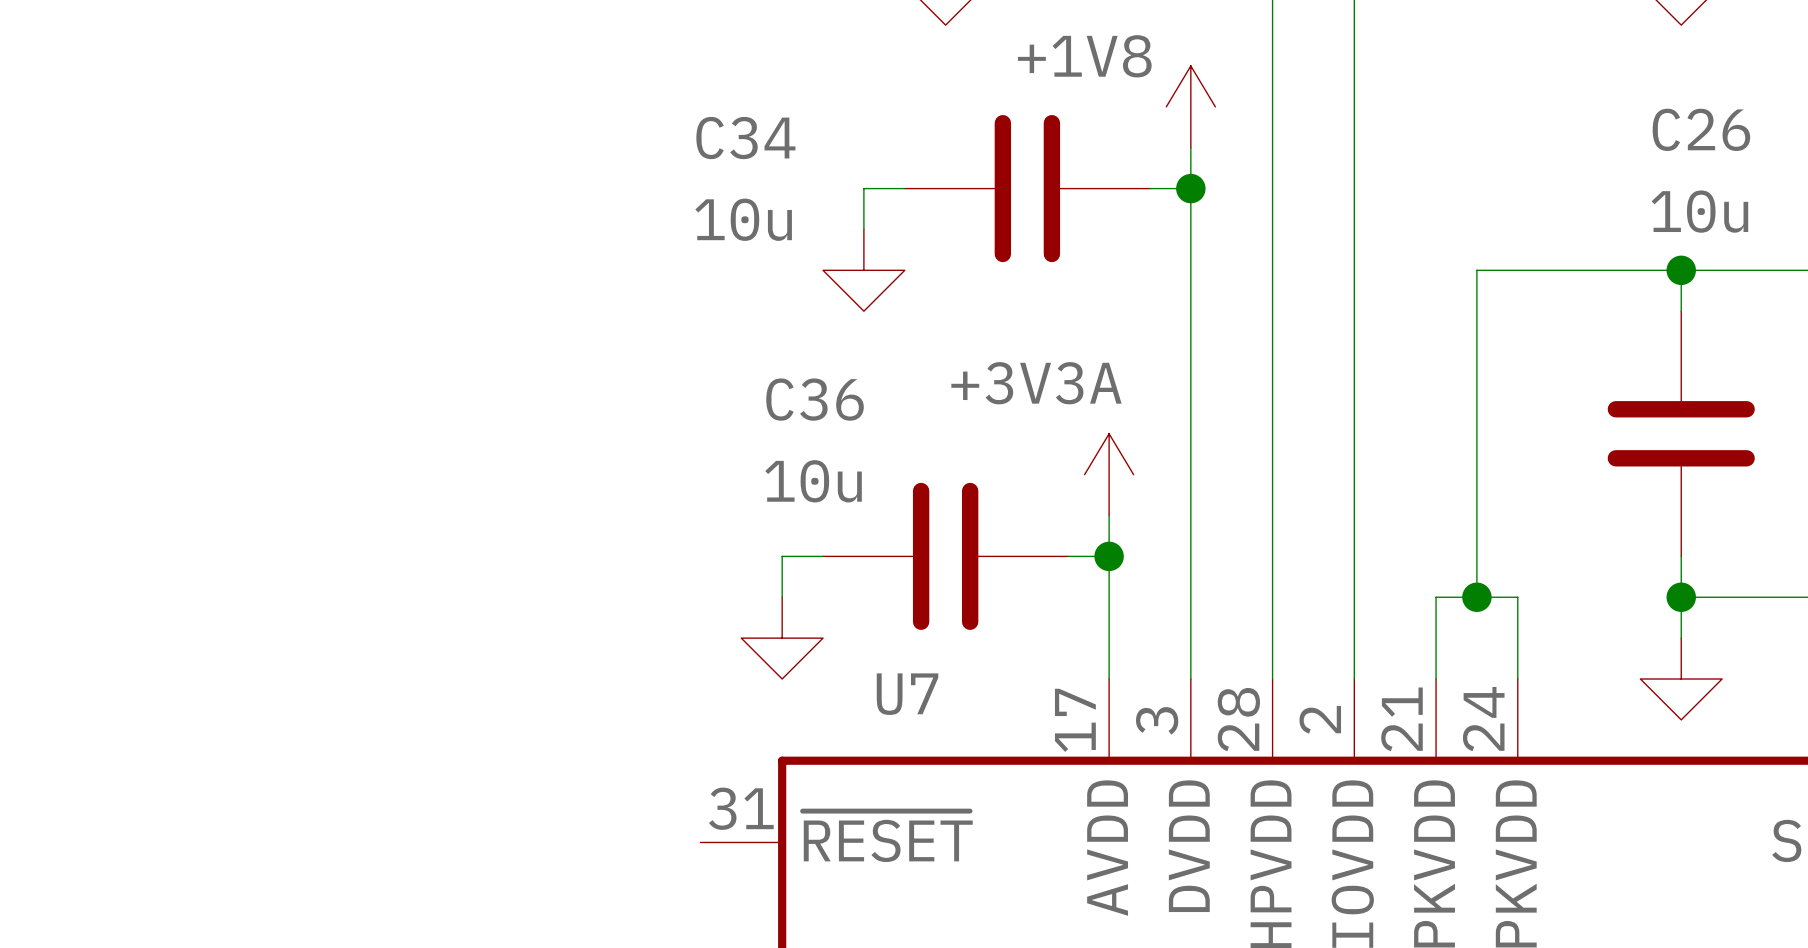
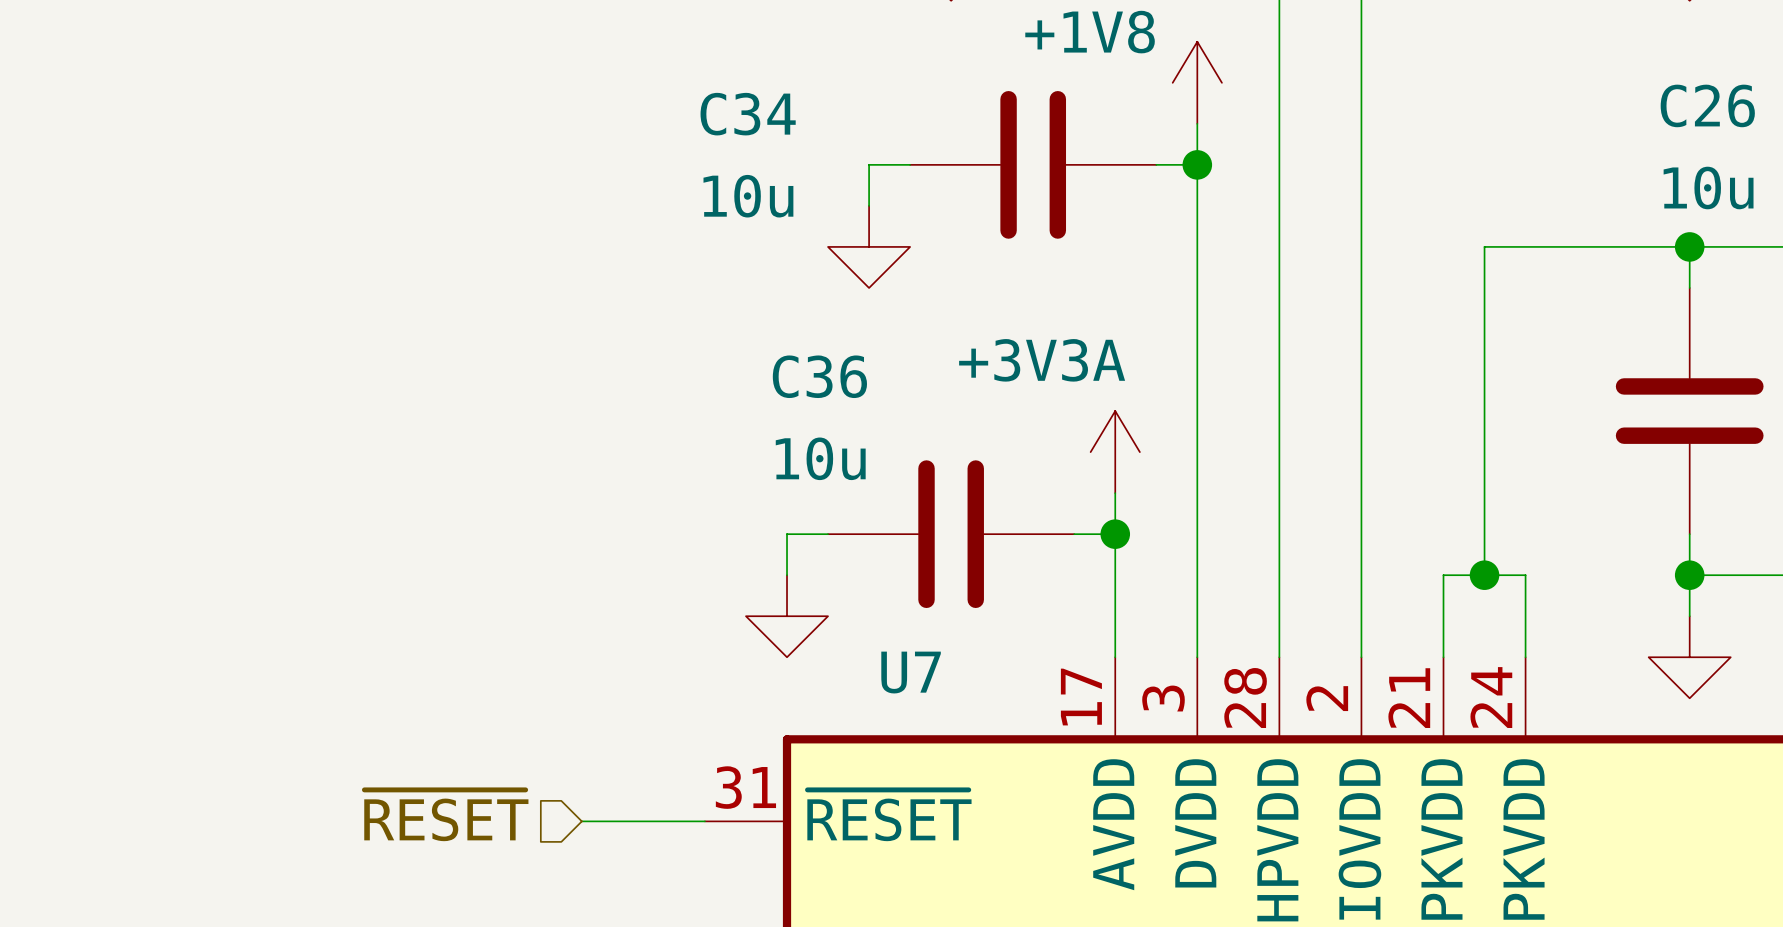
hierarchical label: none -> ~{RESET} (446, 815)
wire: none -> (581, 821) (704, 821)

